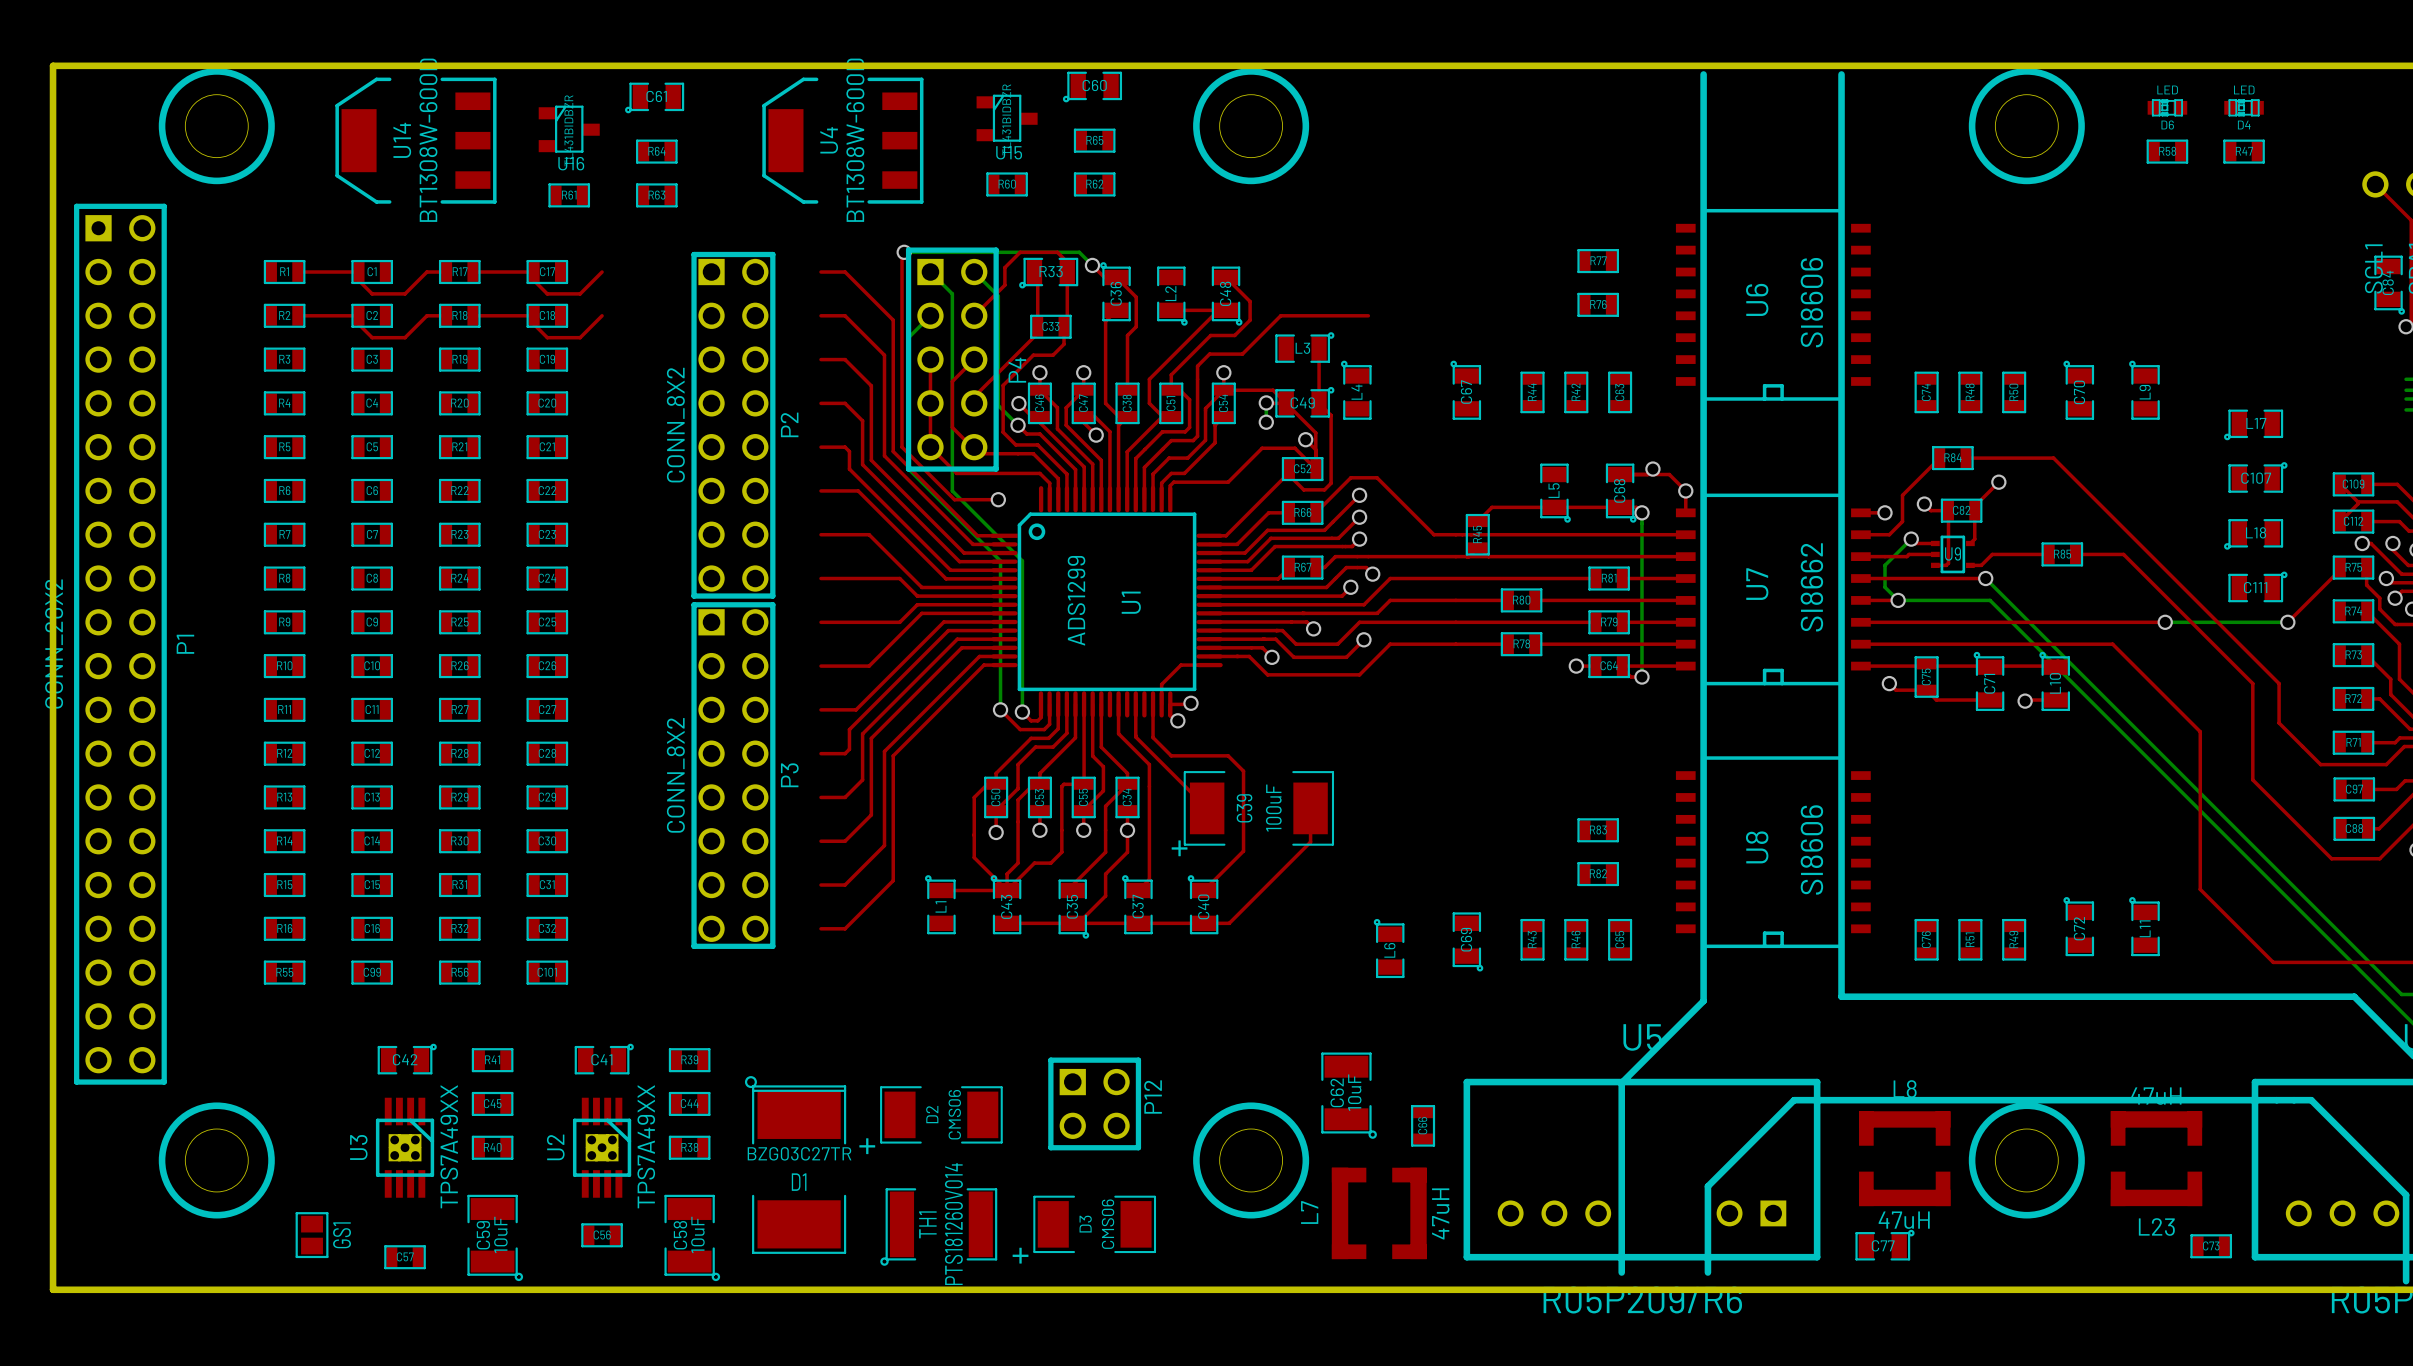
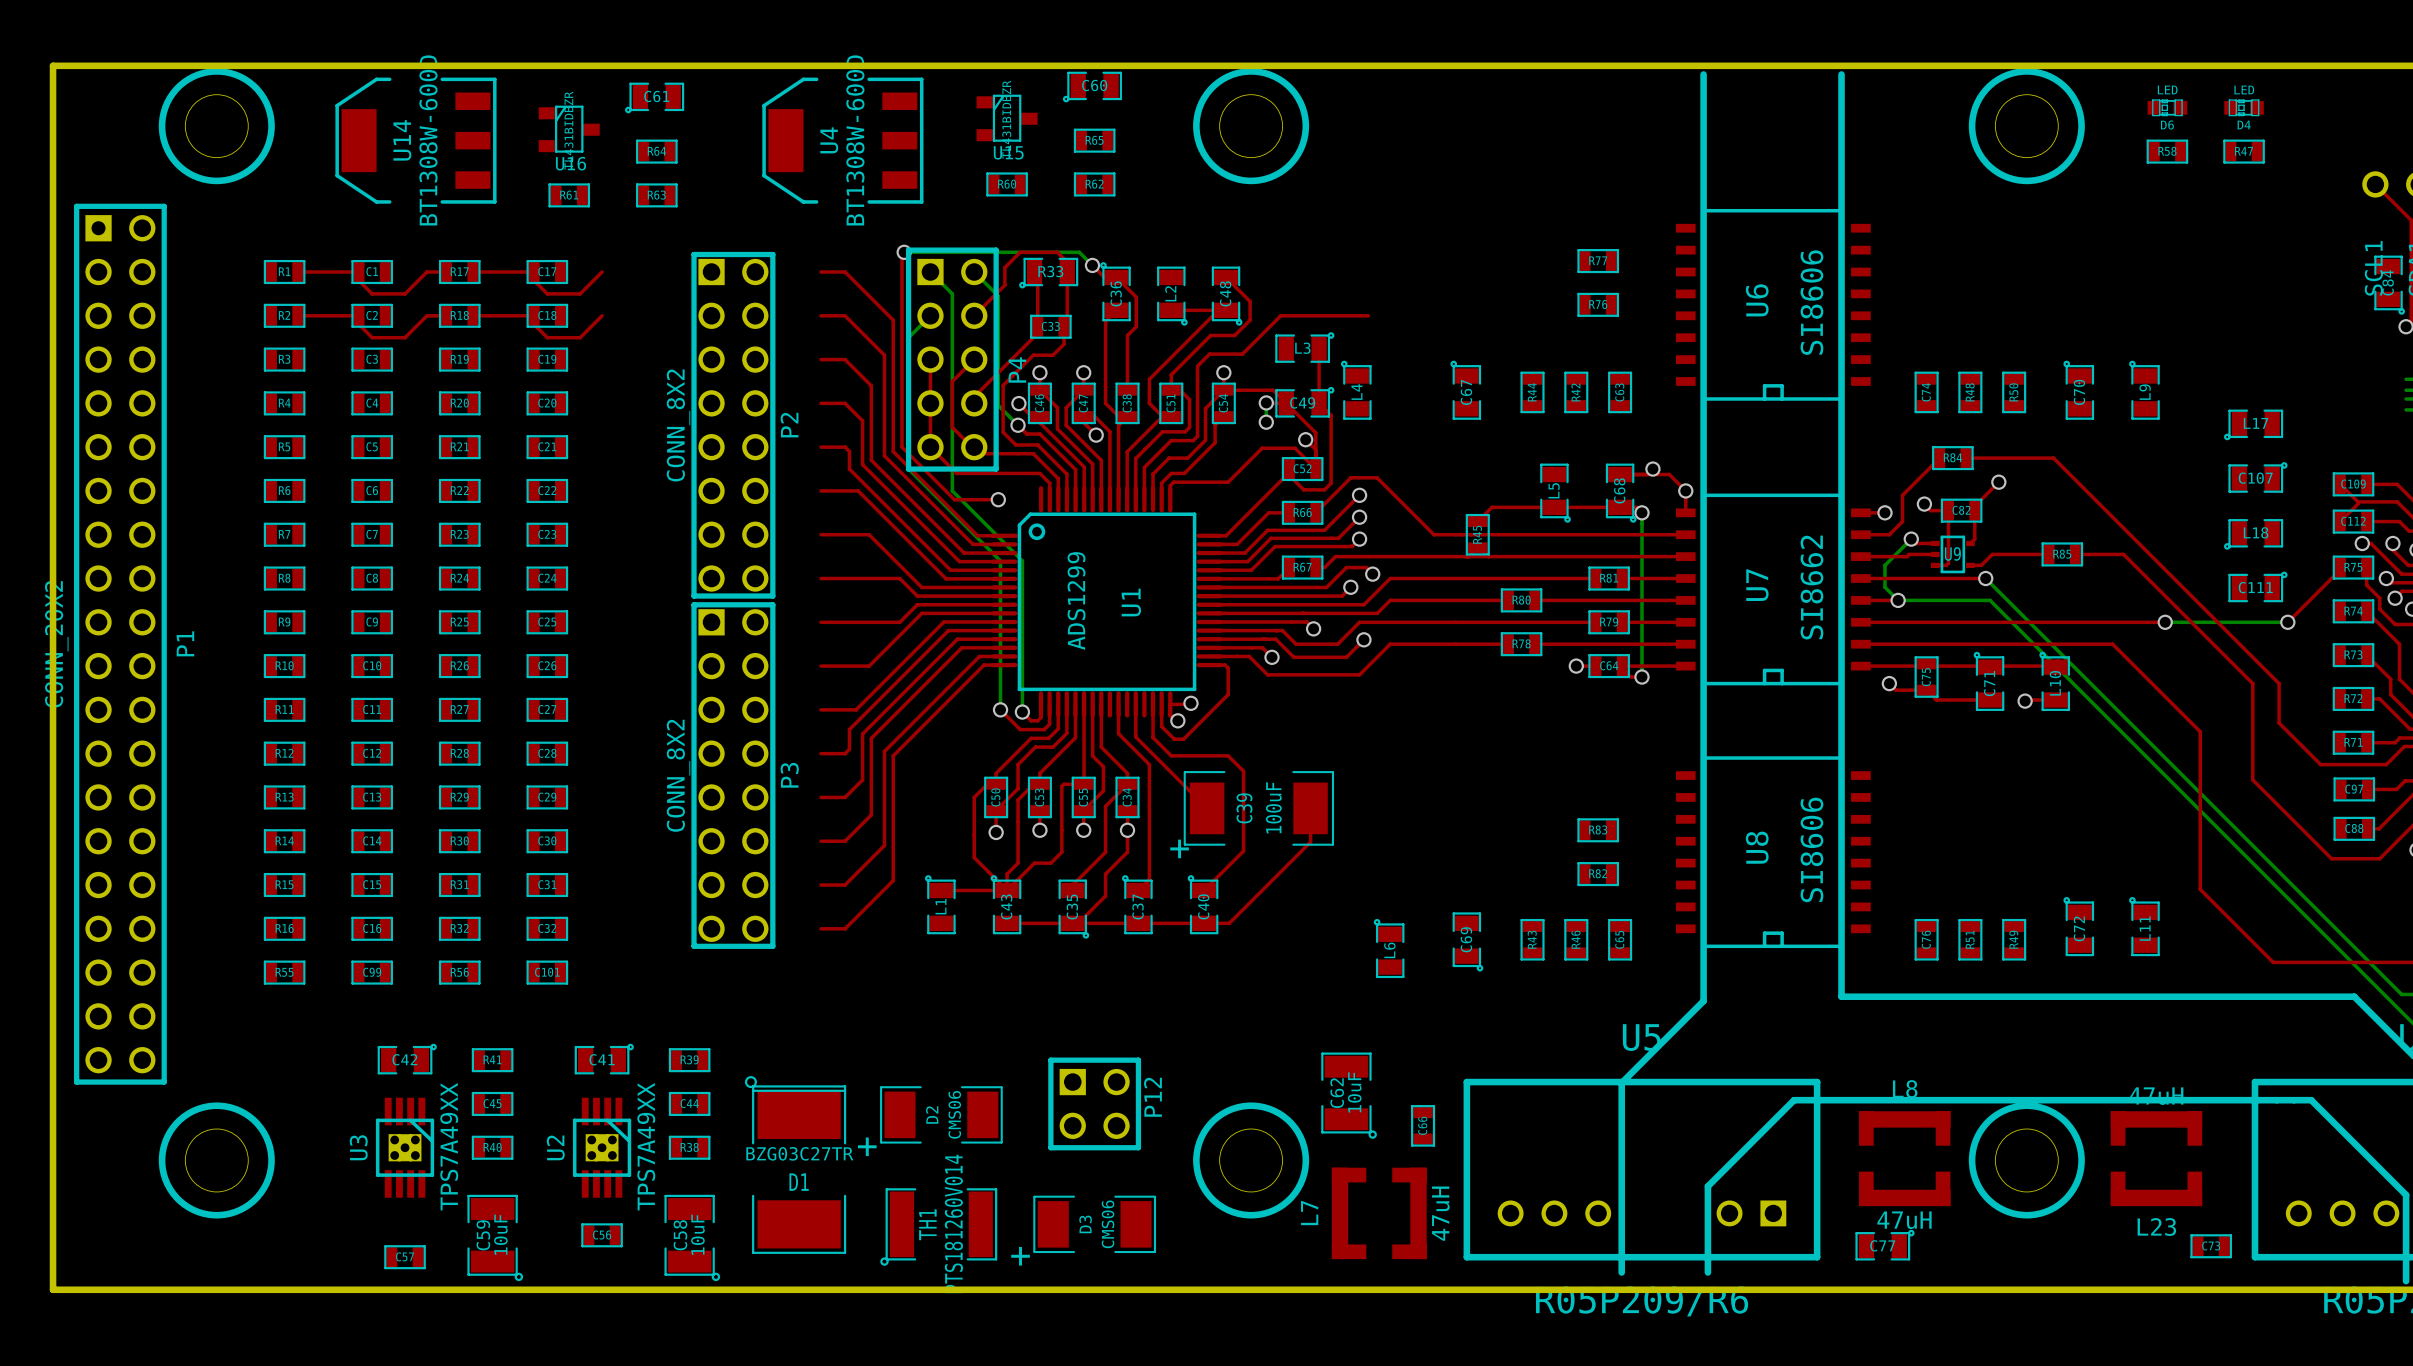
top track: (1209, 665) (1181, 665) (1161, 684) (1161, 704) -> (1209, 665) (1225, 665) (1228, 668) (1228, 694) (1183, 739) (1174, 739) (1161, 726) (1161, 704)
GS1: (312, 1235) -> none

